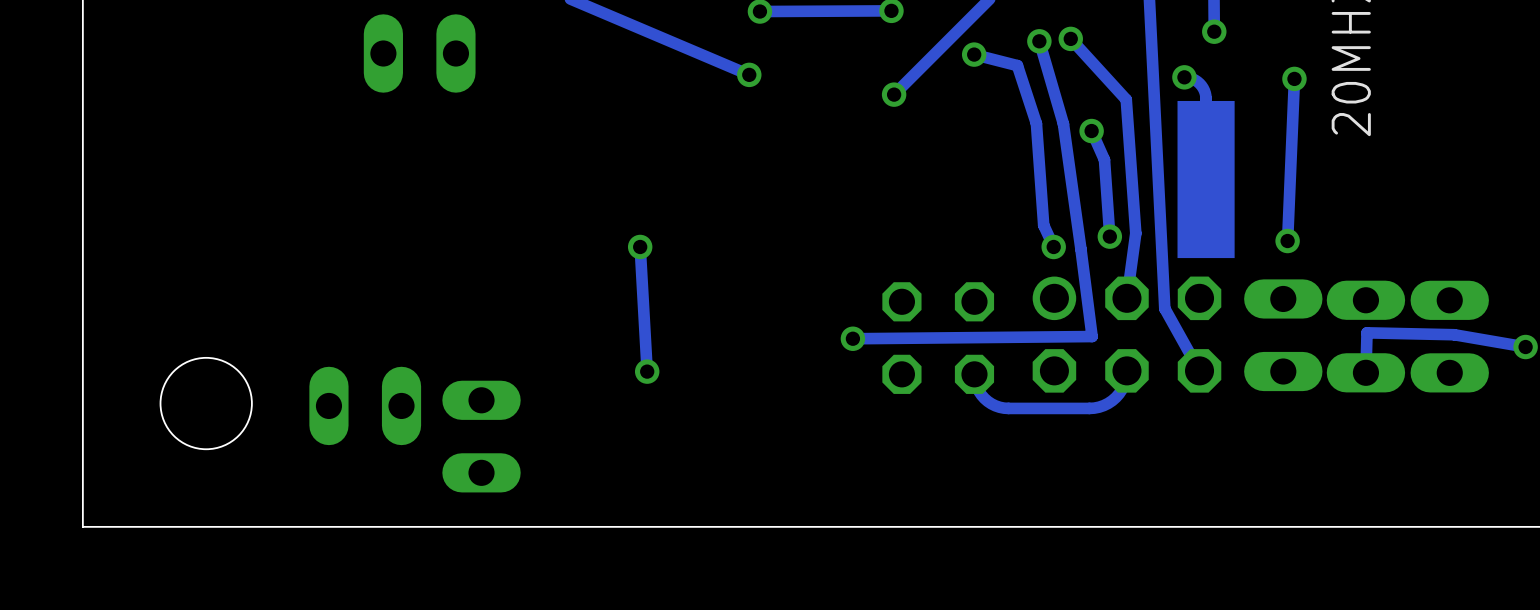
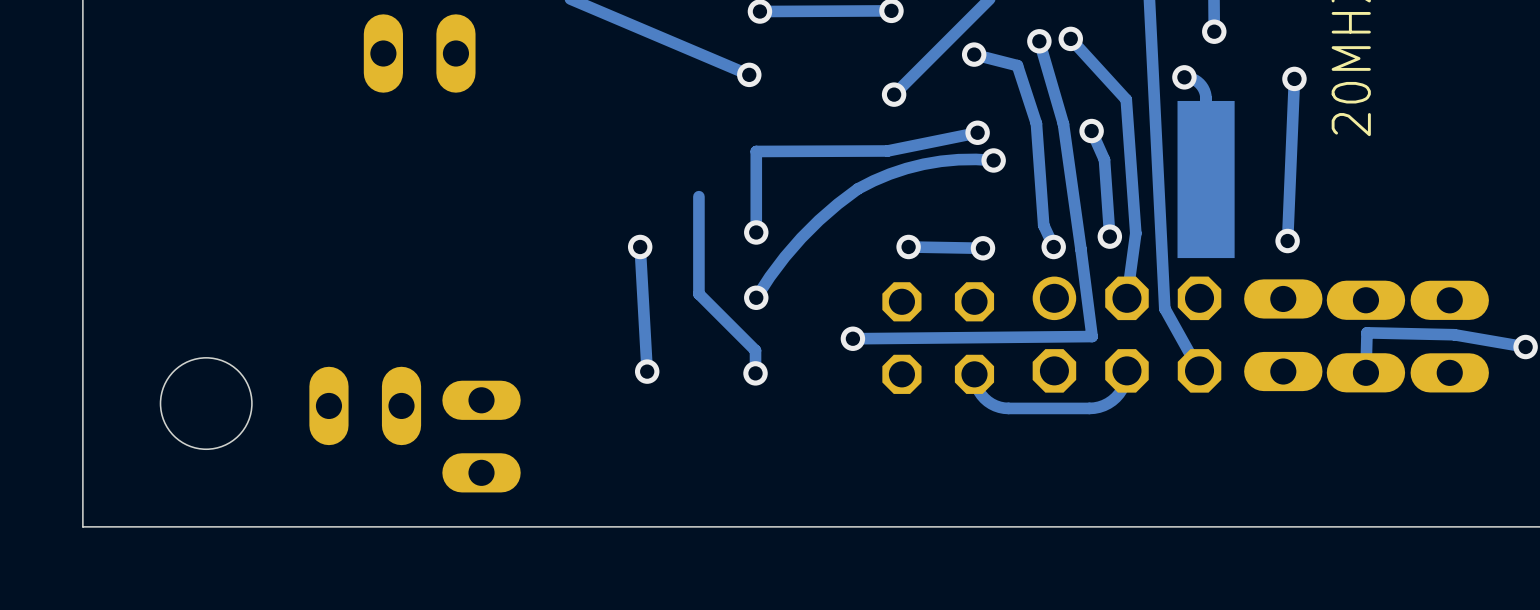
track: none -> (977, 132) (887, 150) (756, 151) (756, 232)
via: none -> (977, 132)
track: none -> (993, 160) (958, 159) (923, 164) (889, 174) (857, 188) (819, 220) (801, 238) (769, 276) (756, 297)
via: none -> (993, 160)
track: none -> (698, 196) (698, 293) (755, 350) (755, 373)
via: none -> (756, 232)
track: none -> (908, 246) (982, 248)
via: none -> (908, 246)
via: none -> (982, 248)
via: none -> (756, 297)
via: none -> (755, 373)

